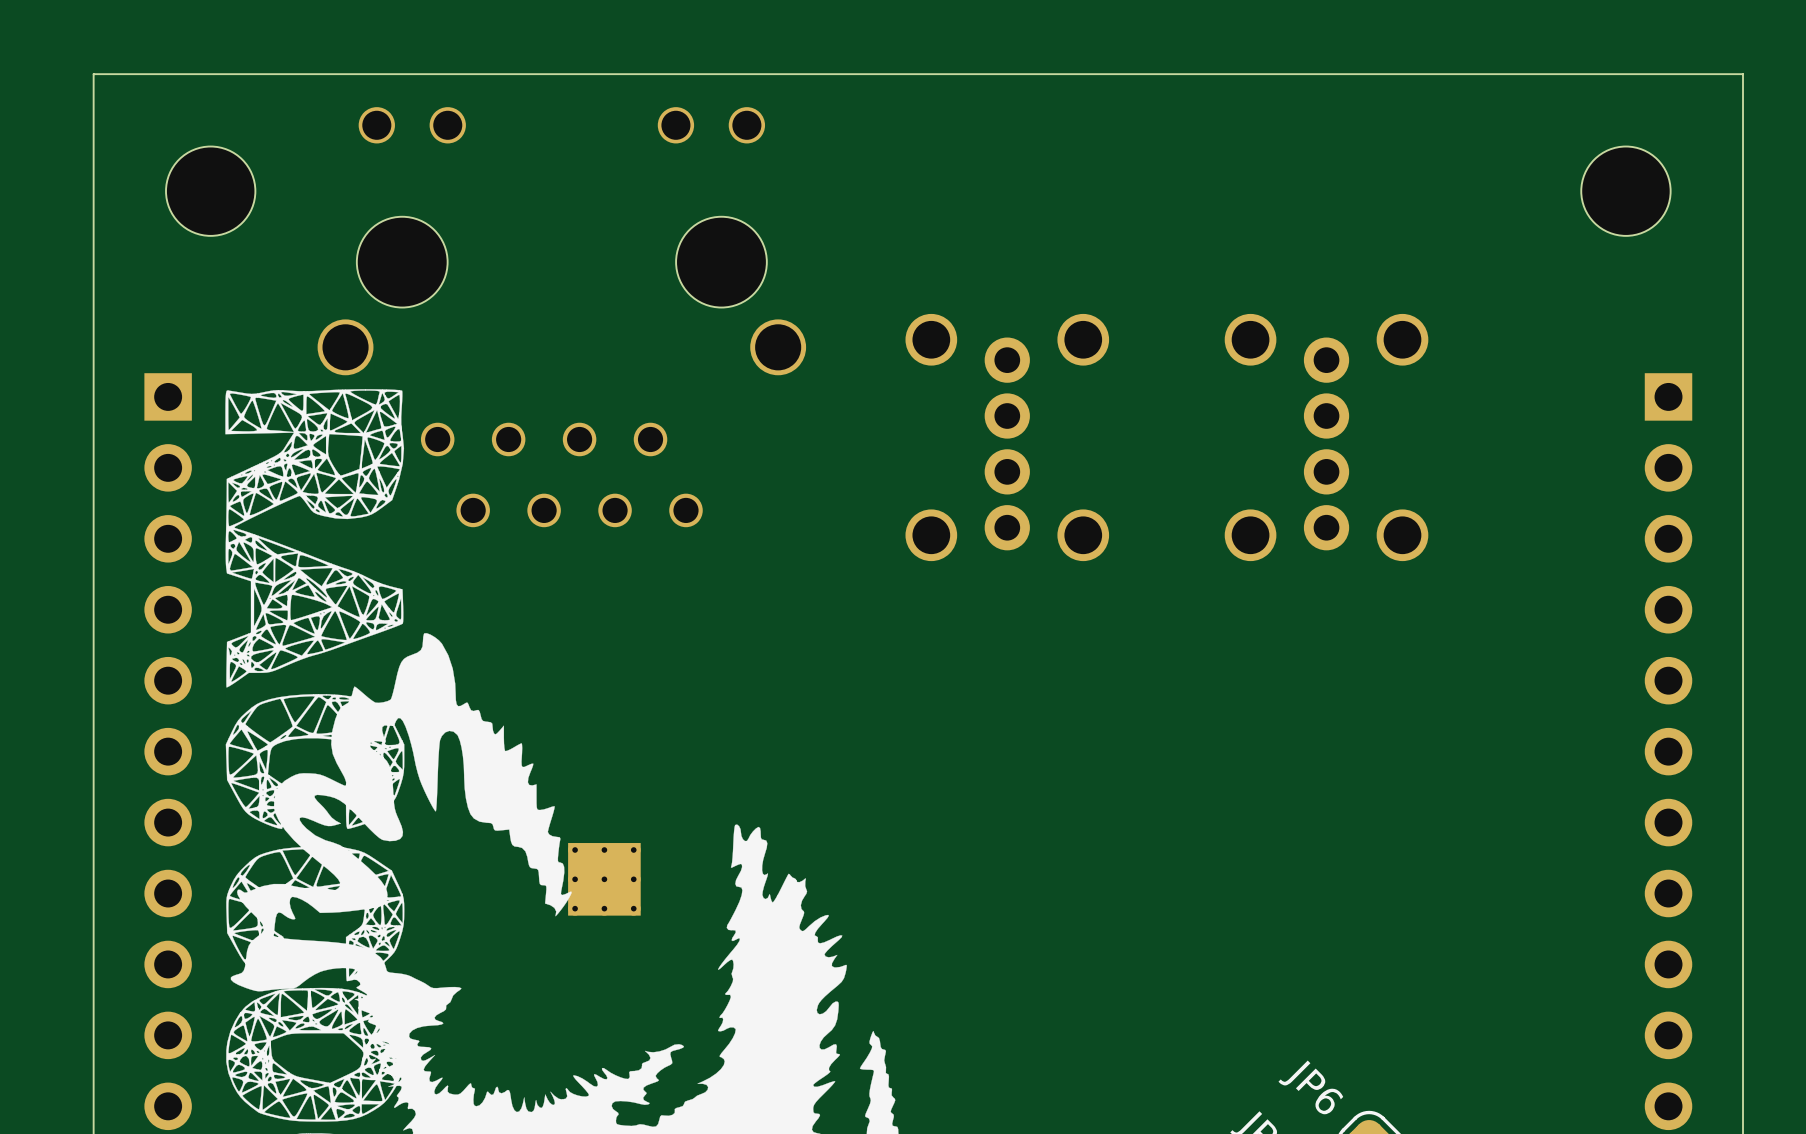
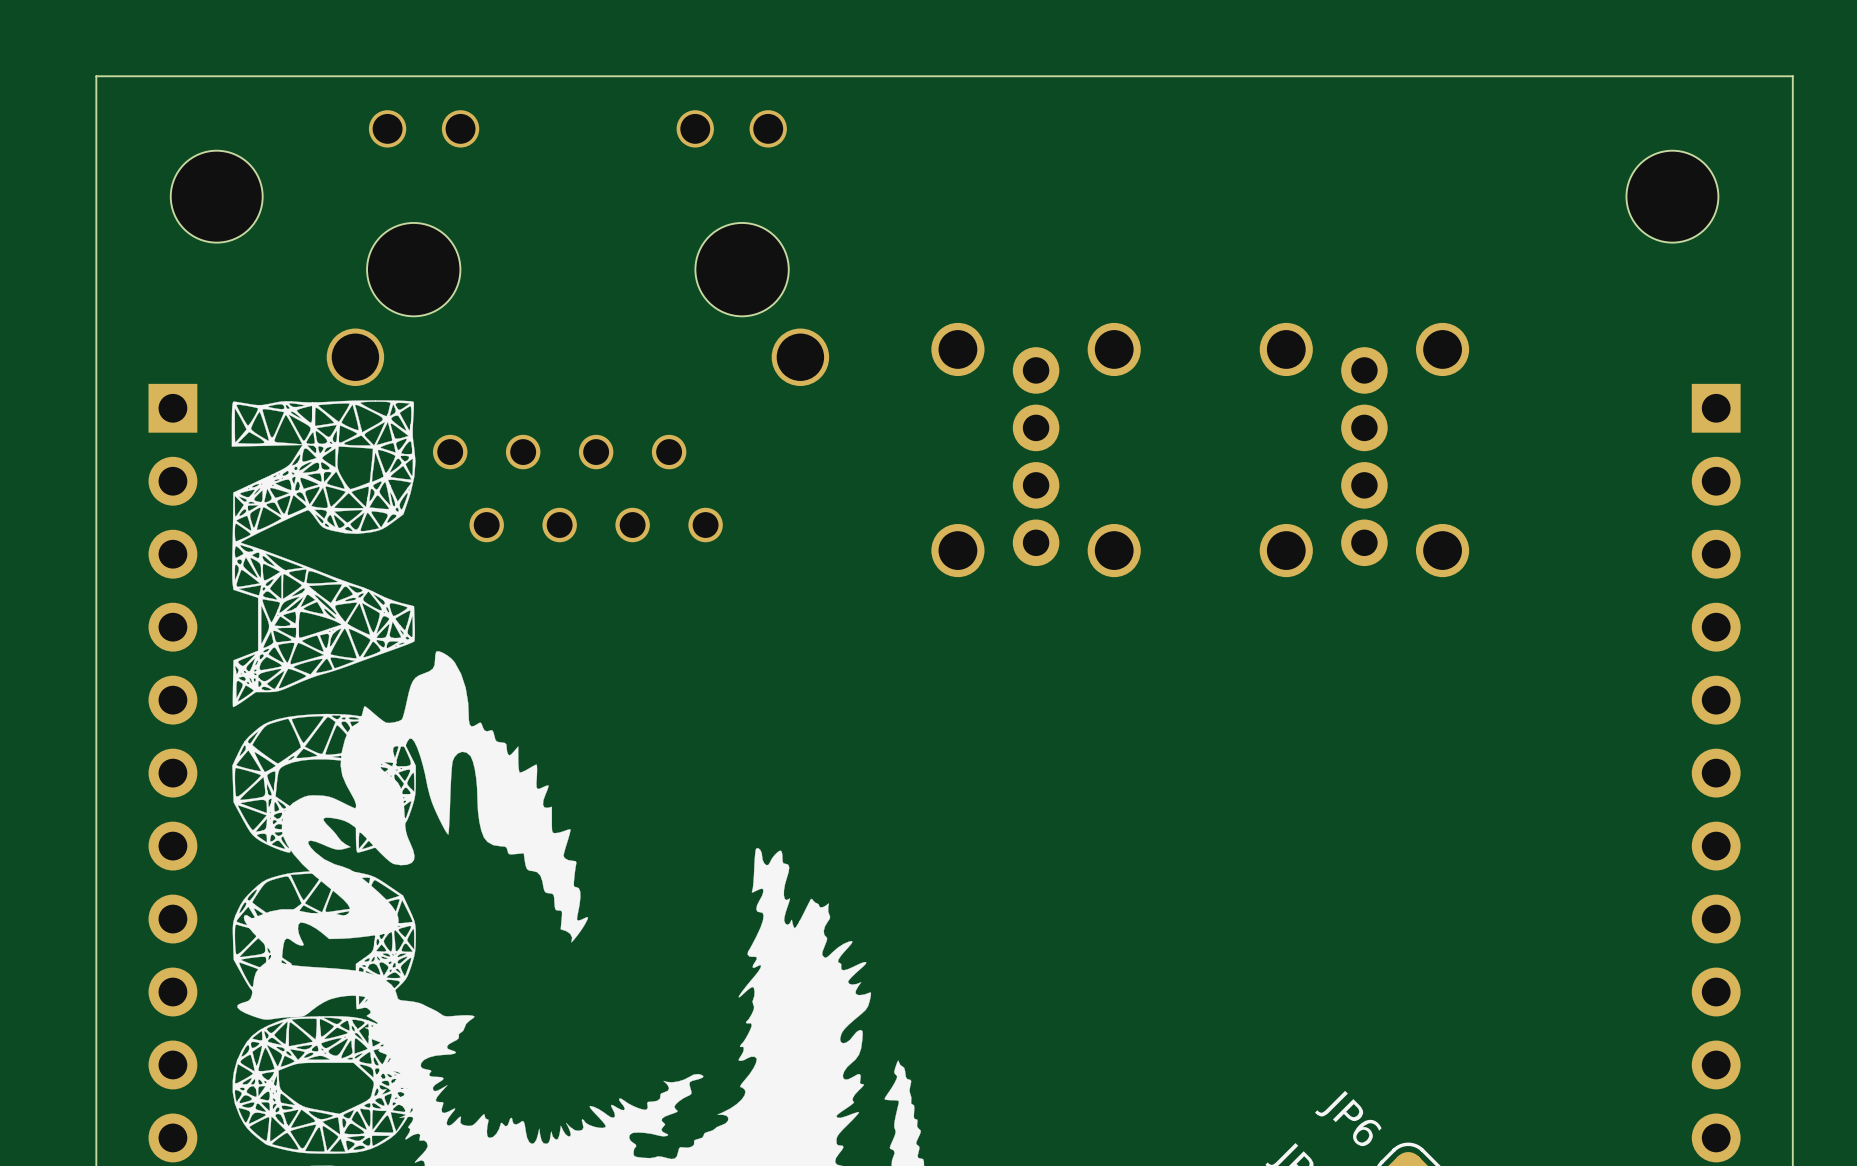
part: (604, 879) -> none

